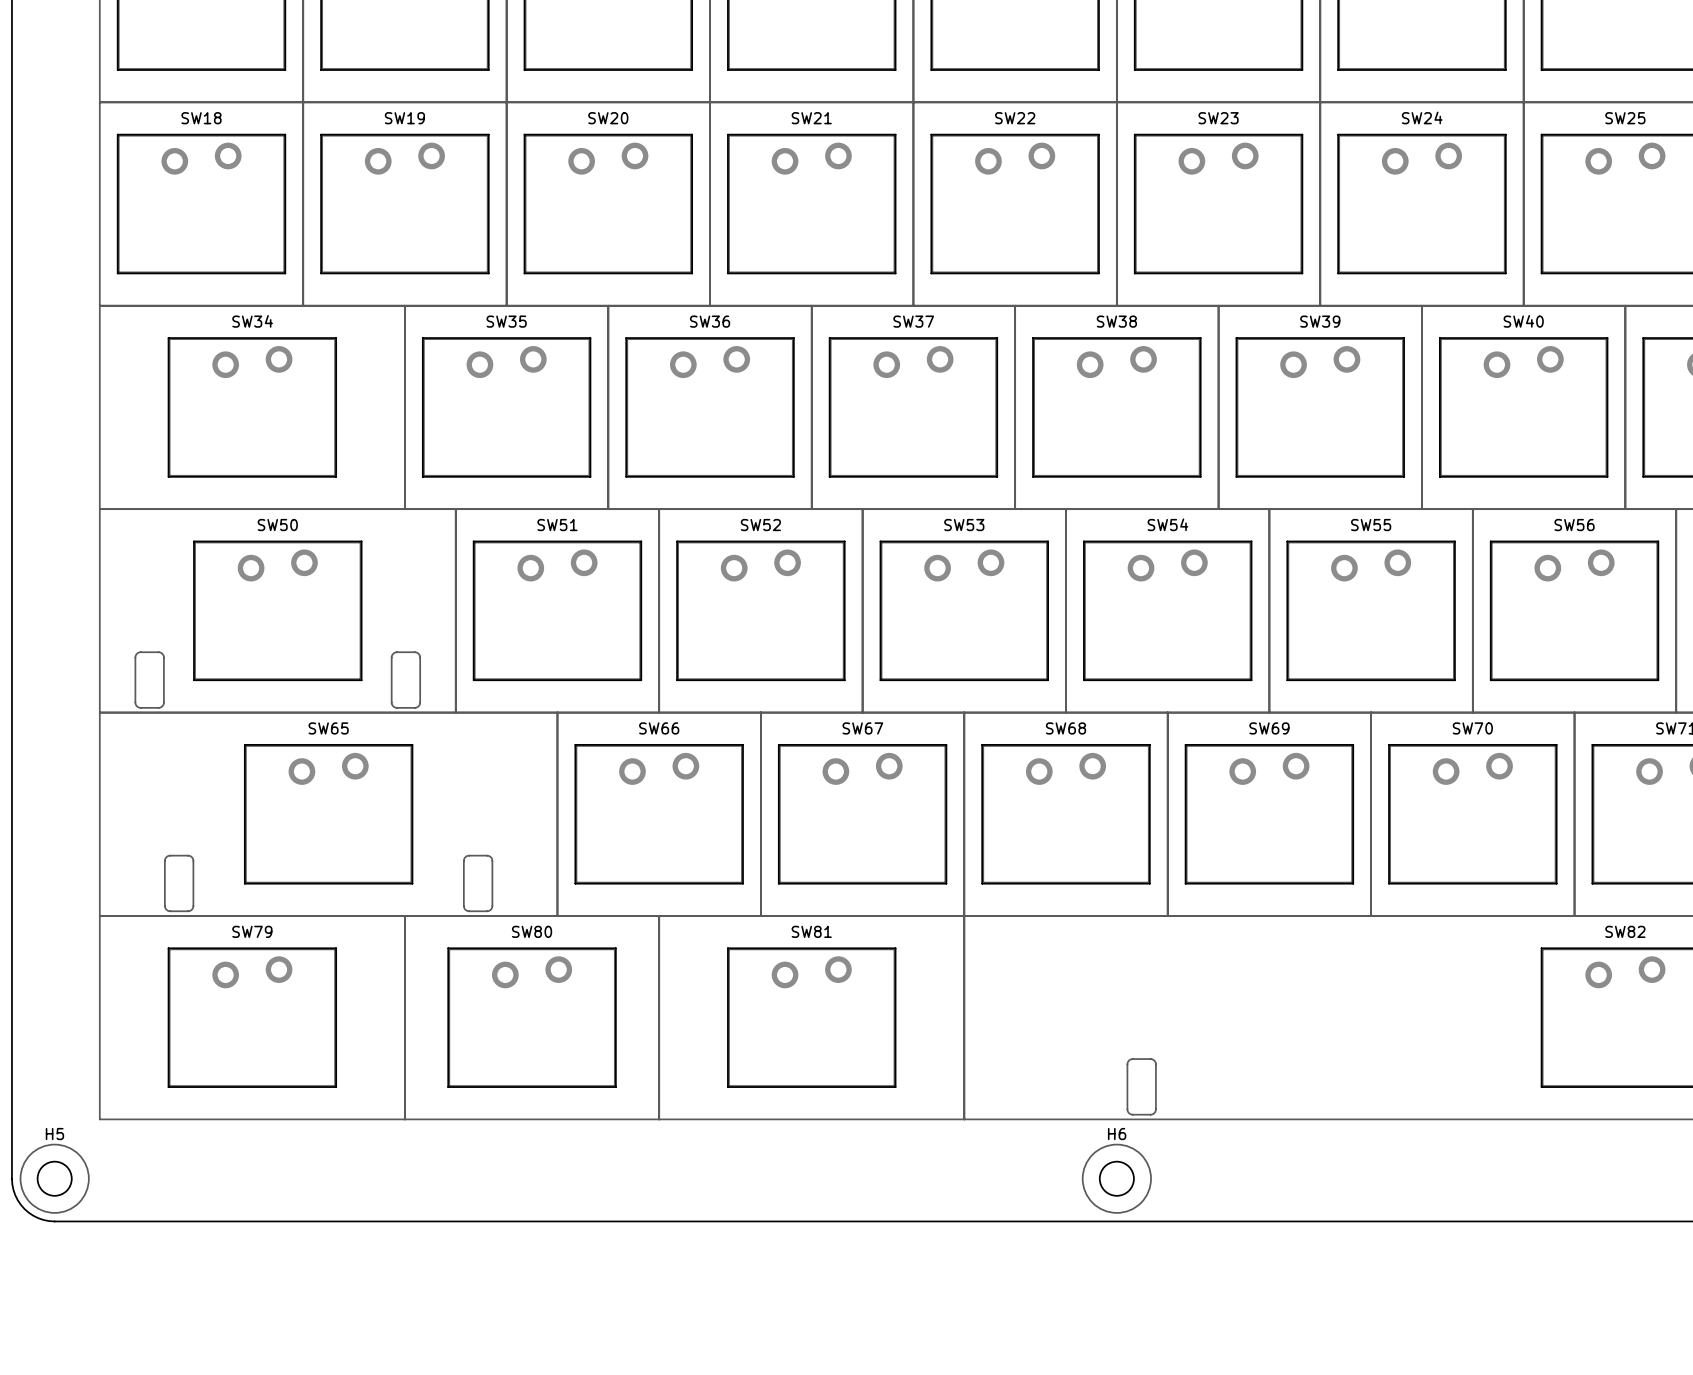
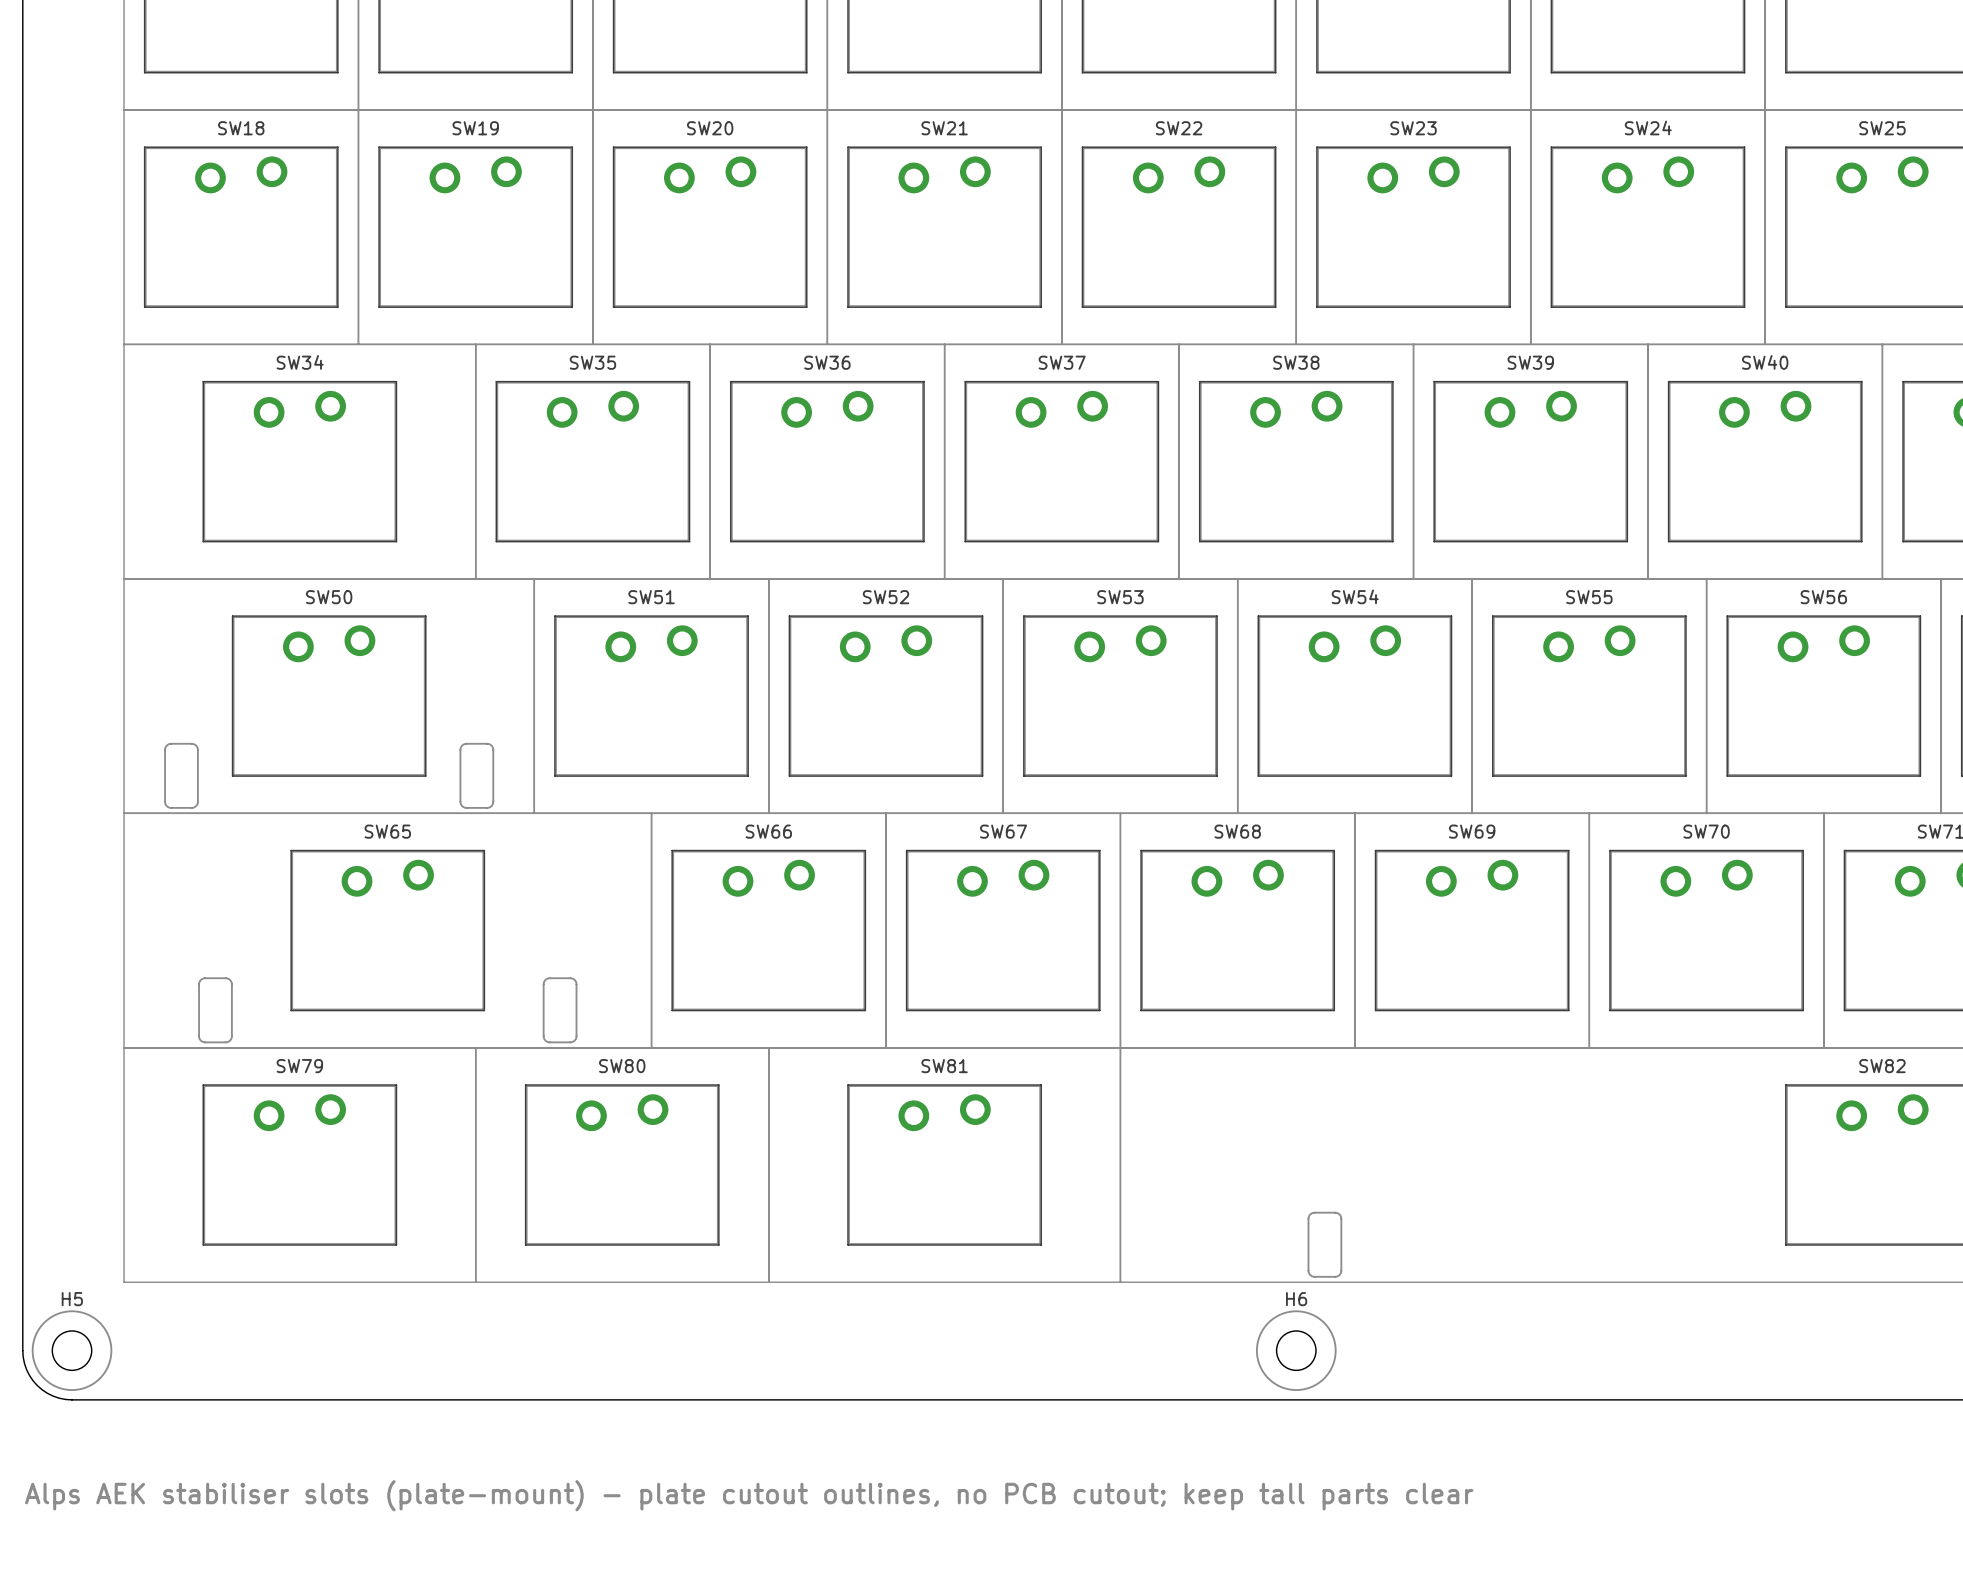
text: none -> Alps AEK stabiliser slots (plate-mount) - plate cutout outlines, no PCB cutout; keep tall parts clear (749, 1495)

